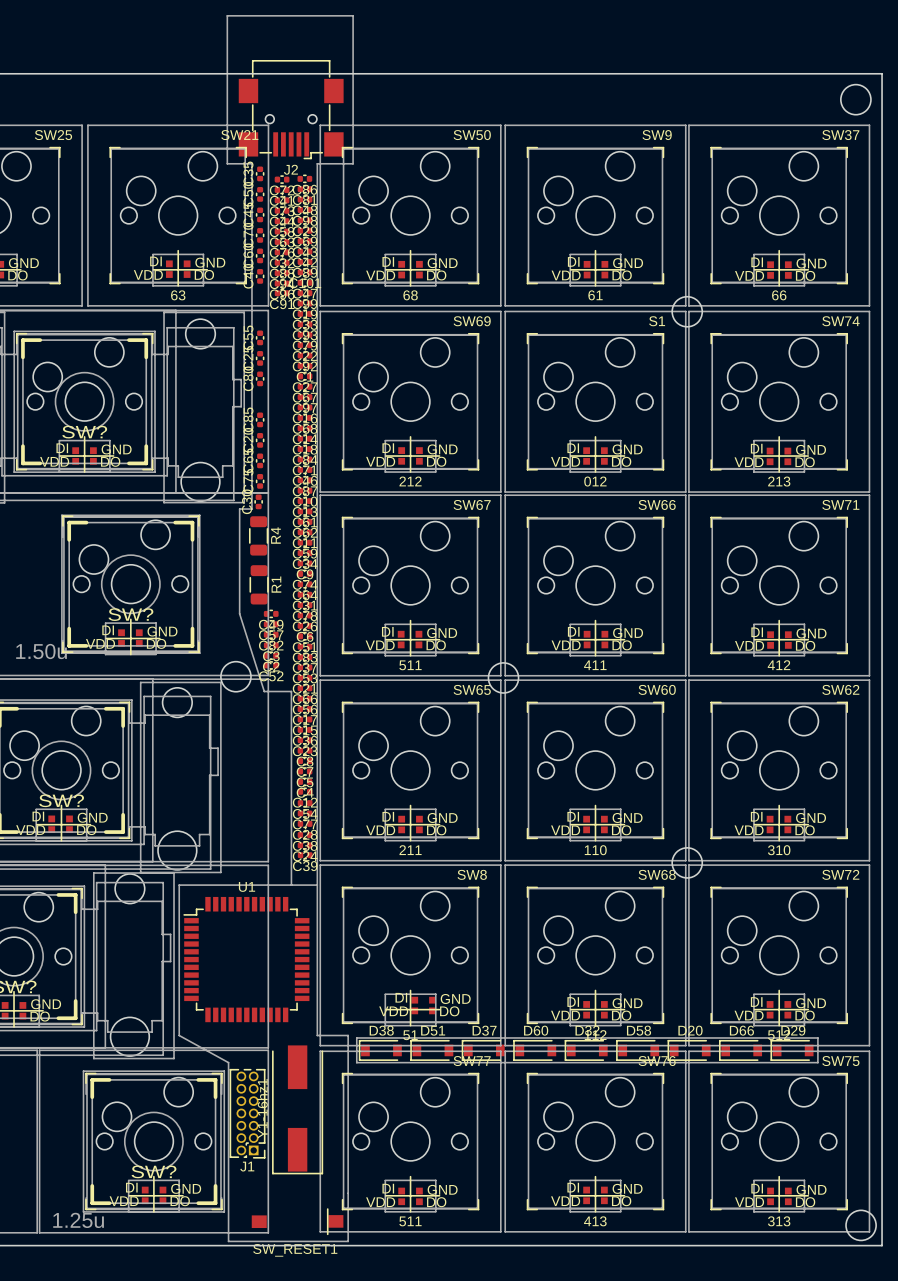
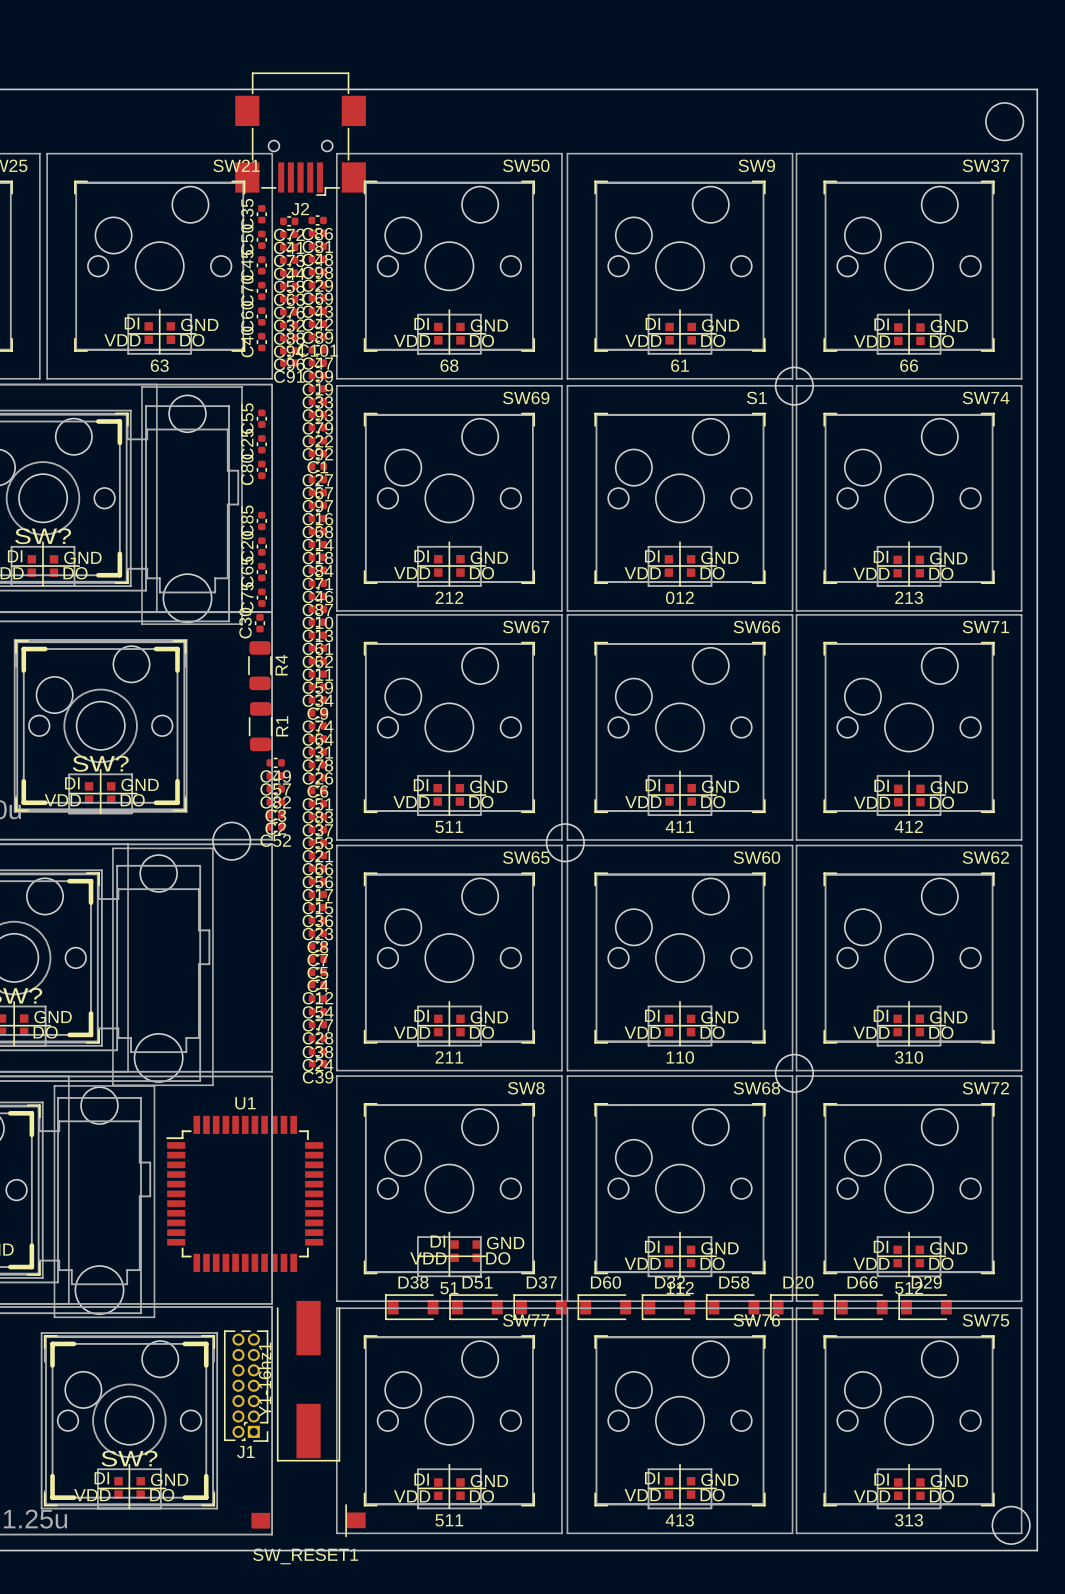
line: (291, 885) (291, 691) (264, 691) (239, 613) (239, 509) (251, 509) (251, 163) (227, 163) (227, 15) (353, 15) (353, 163) (317, 163) (317, 1035) (348, 1035) (348, 1241) (228, 1241) (228, 1062) (179, 1035) (179, 885) (317, 885) -> none
line: (356, 1037) (817, 1037) (817, 1062) (356, 1062) (356, 1037) -> none

